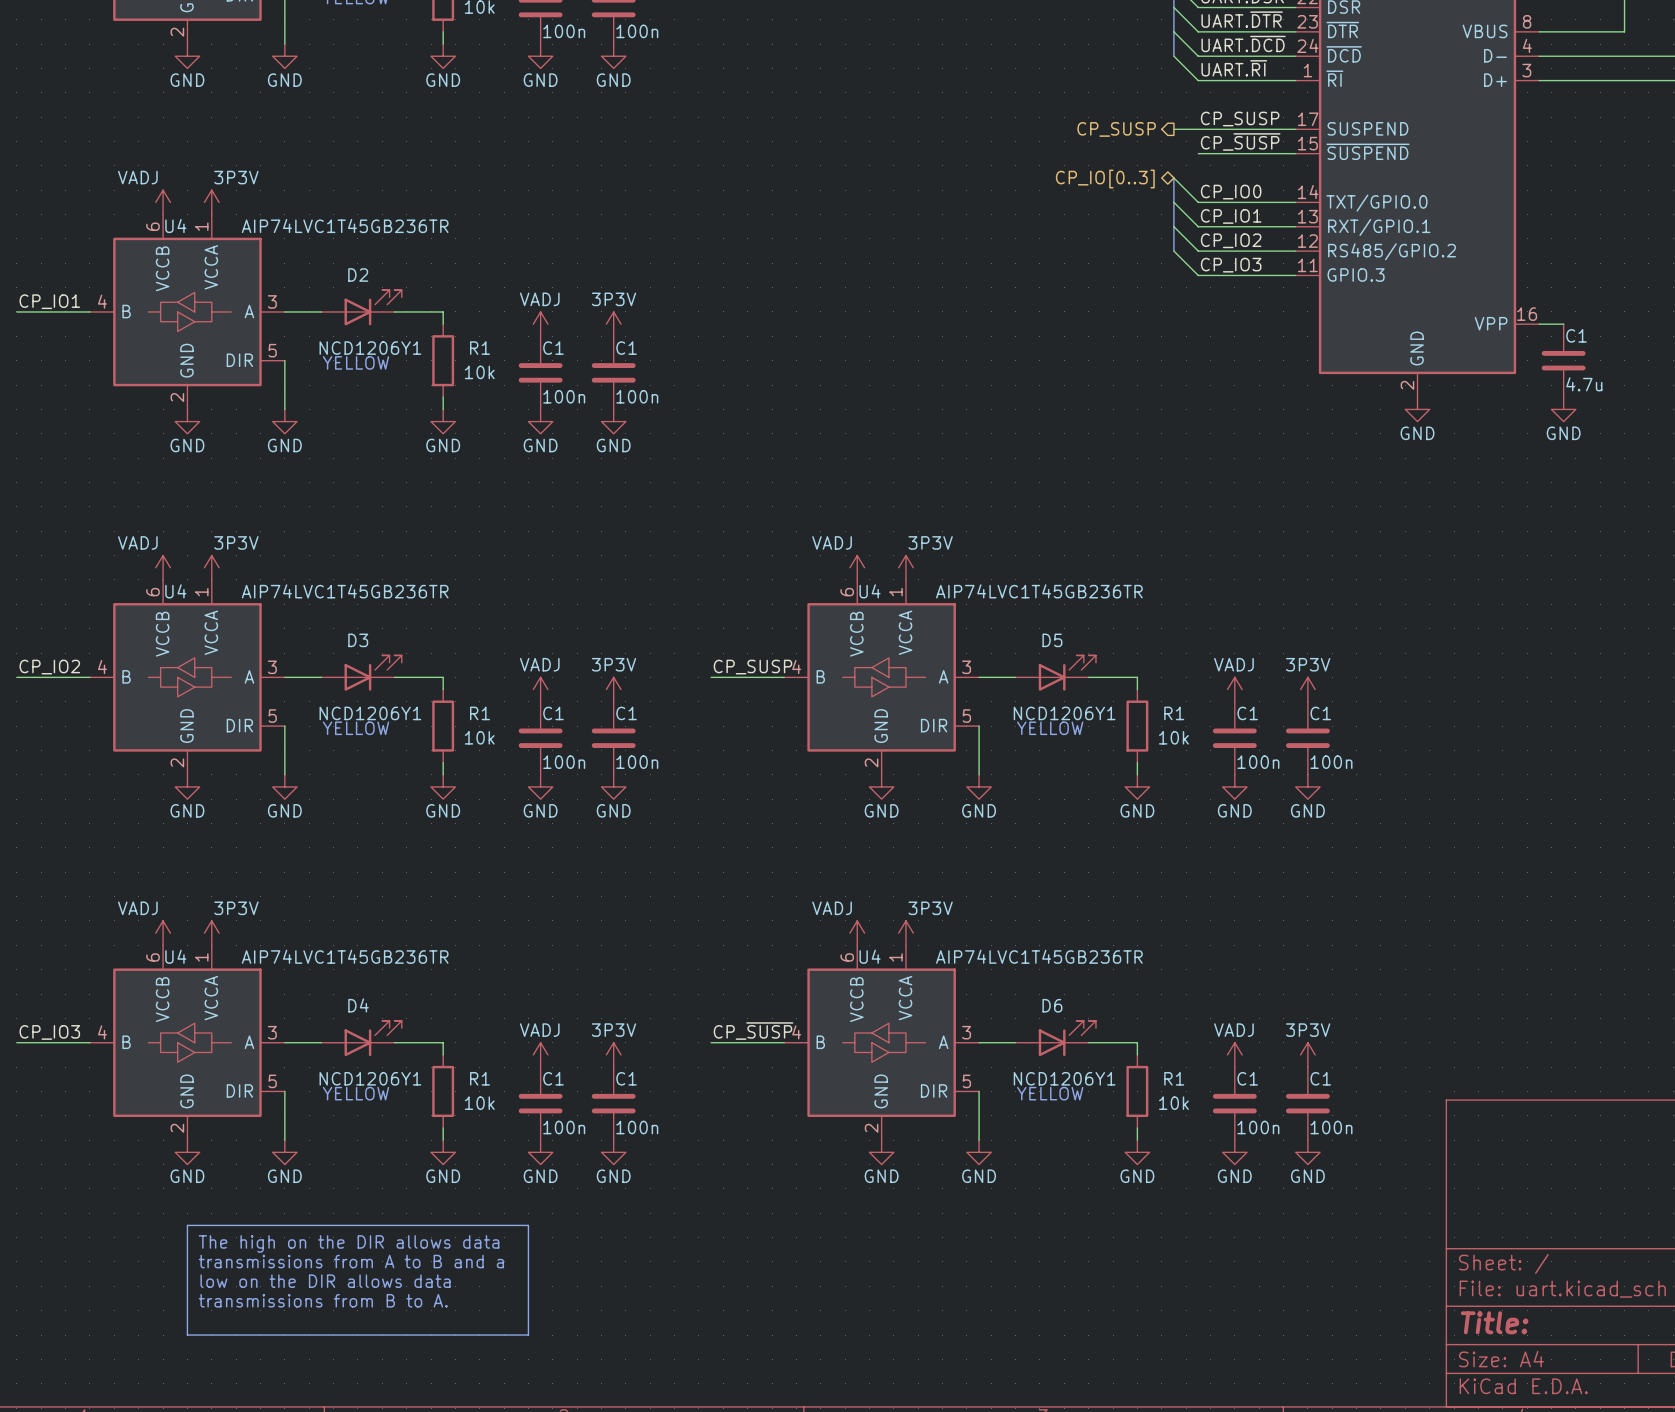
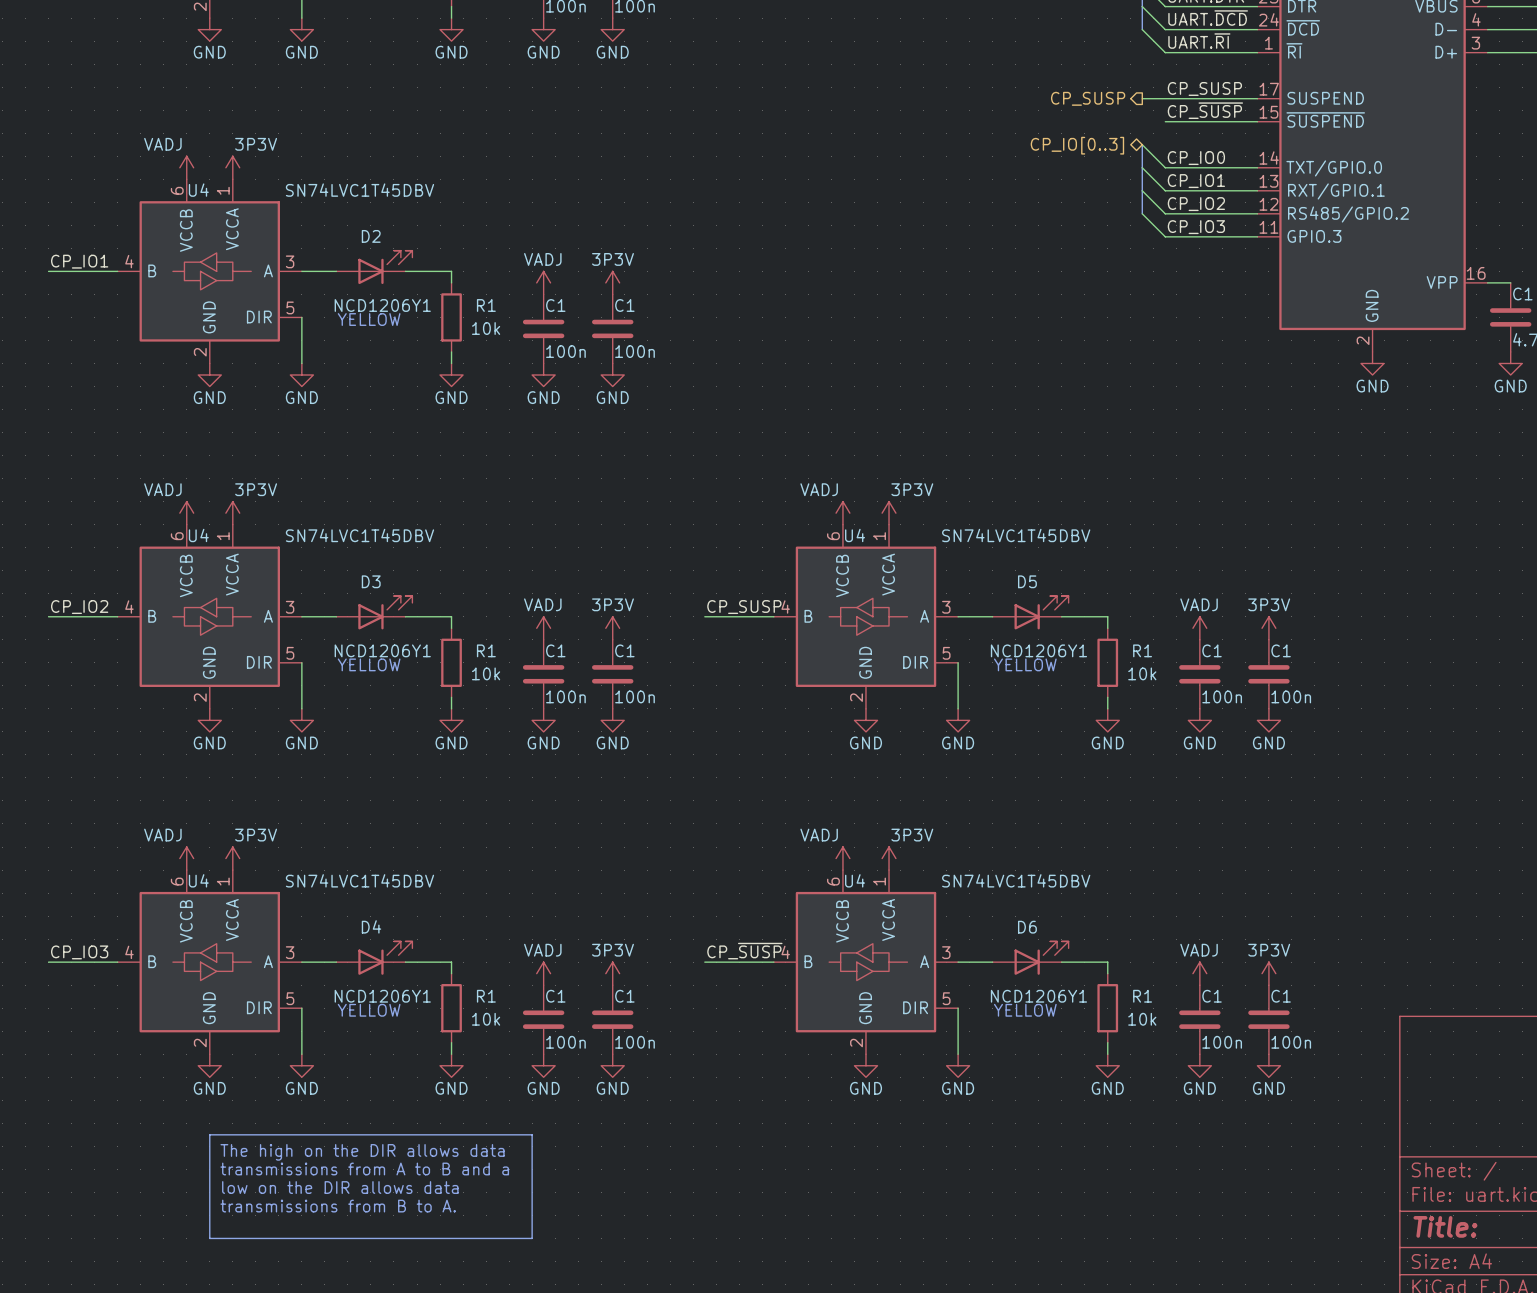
U4 value: AIP74LVC1T45GB236TR (345, 225) -> SN74LVC1T45DBV (359, 190)
U4 value: AIP74LVC1T45GB236TR (345, 591) -> SN74LVC1T45DBV (359, 535)
U4 value: AIP74LVC1T45GB236TR (1039, 591) -> SN74LVC1T45DBV (1016, 535)
U4 value: AIP74LVC1T45GB236TR (345, 956) -> SN74LVC1T45DBV (359, 880)
U4 value: AIP74LVC1T45GB236TR (1039, 956) -> SN74LVC1T45DBV (1016, 880)

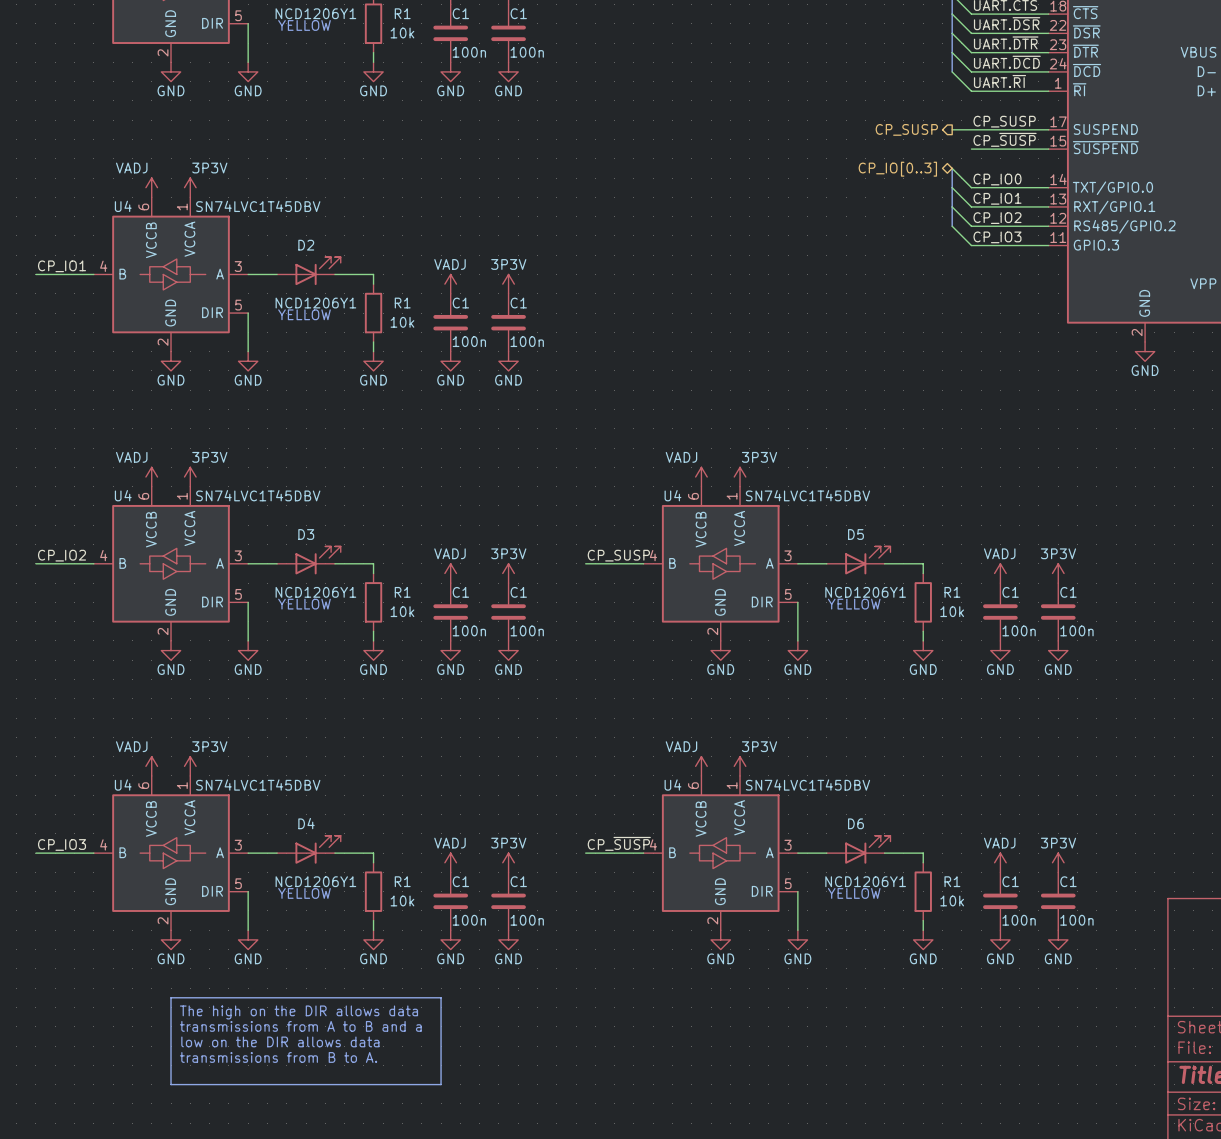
U4 name position: U4 (198, 190) -> U4 (123, 206)
U4 value position: SN74LVC1T45DBV (359, 190) -> SN74LVC1T45DBV (258, 206)
U4 name position: U4 (198, 535) -> U4 (123, 495)
U4 value position: SN74LVC1T45DBV (359, 535) -> SN74LVC1T45DBV (258, 495)
U4 name position: U4 (855, 535) -> U4 (672, 495)
U4 value position: SN74LVC1T45DBV (1016, 535) -> SN74LVC1T45DBV (807, 495)
U4 name position: U4 (198, 880) -> U4 (123, 785)
U4 value position: SN74LVC1T45DBV (359, 880) -> SN74LVC1T45DBV (258, 785)
U4 name position: U4 (855, 880) -> U4 (672, 785)
U4 value position: SN74LVC1T45DBV (1016, 880) -> SN74LVC1T45DBV (807, 785)

